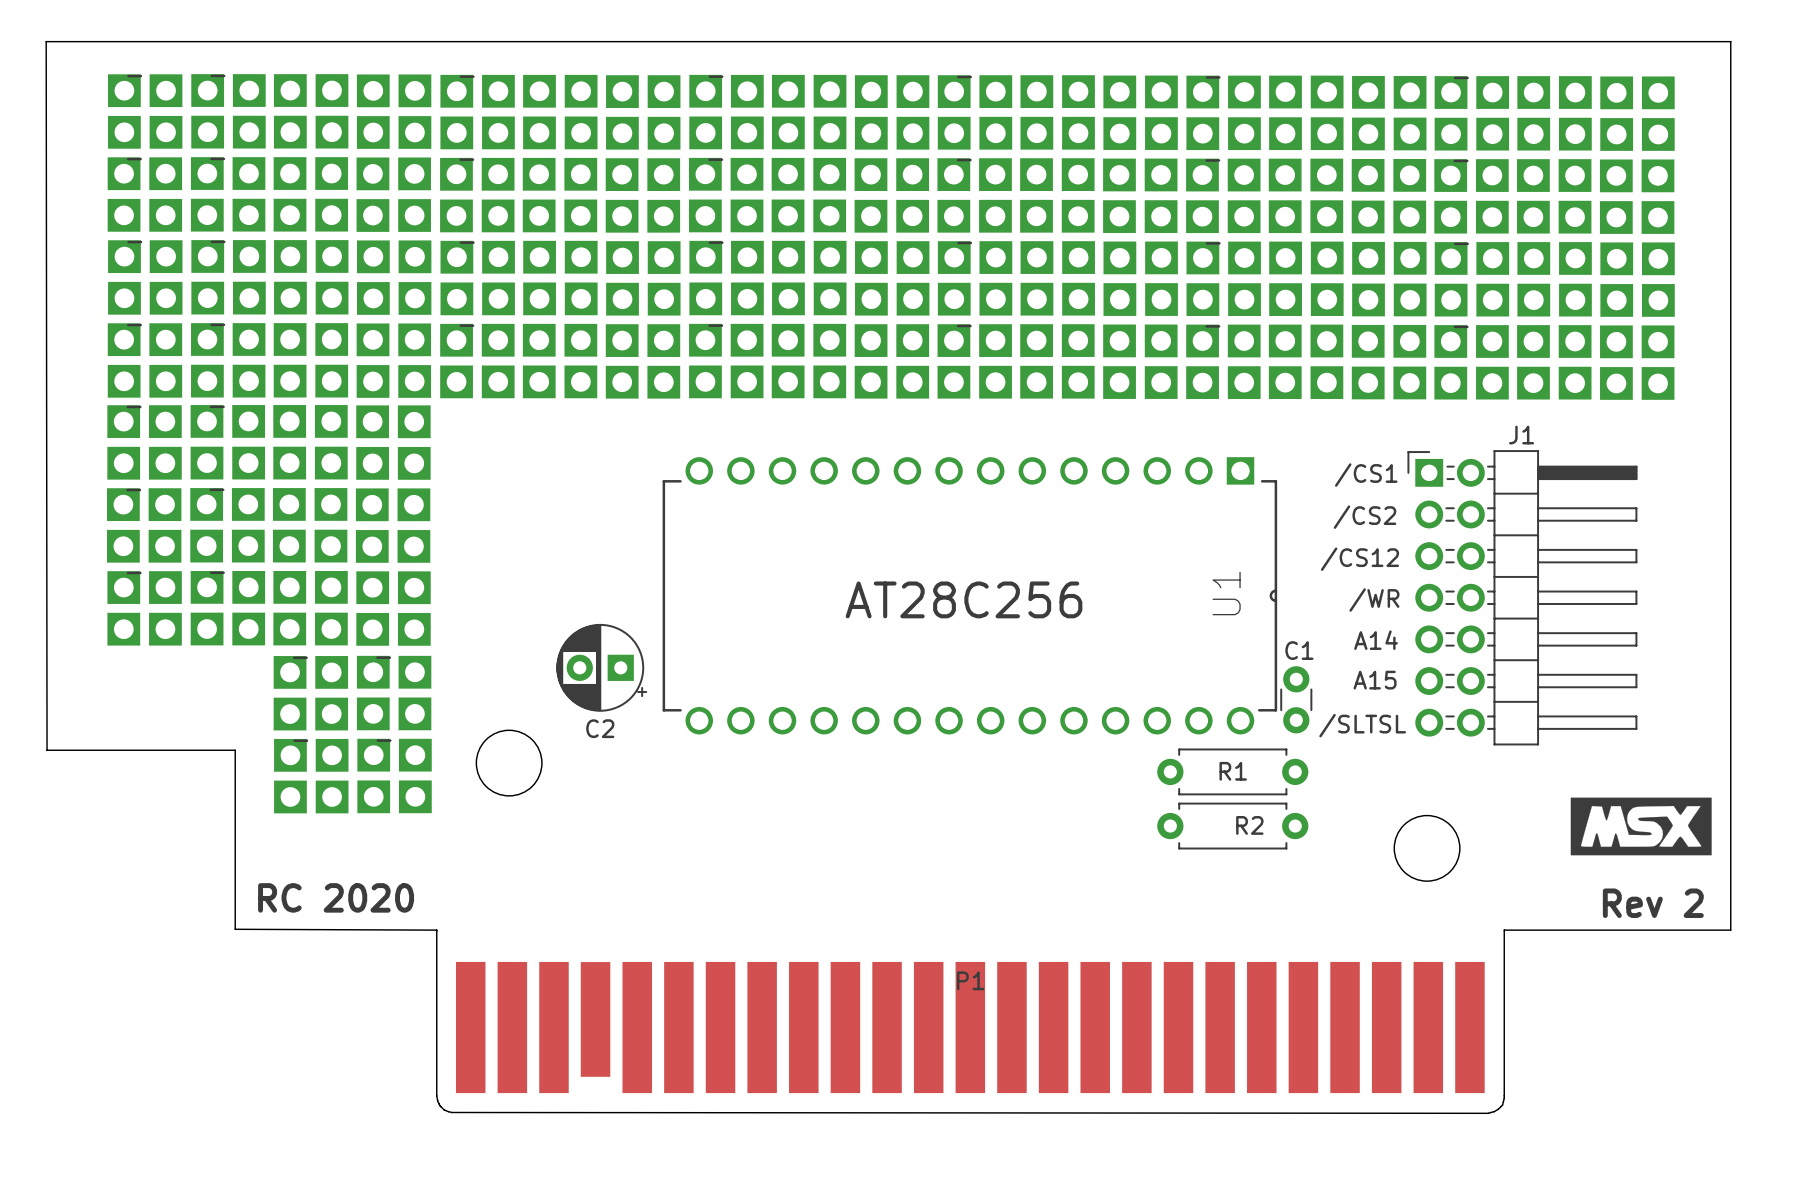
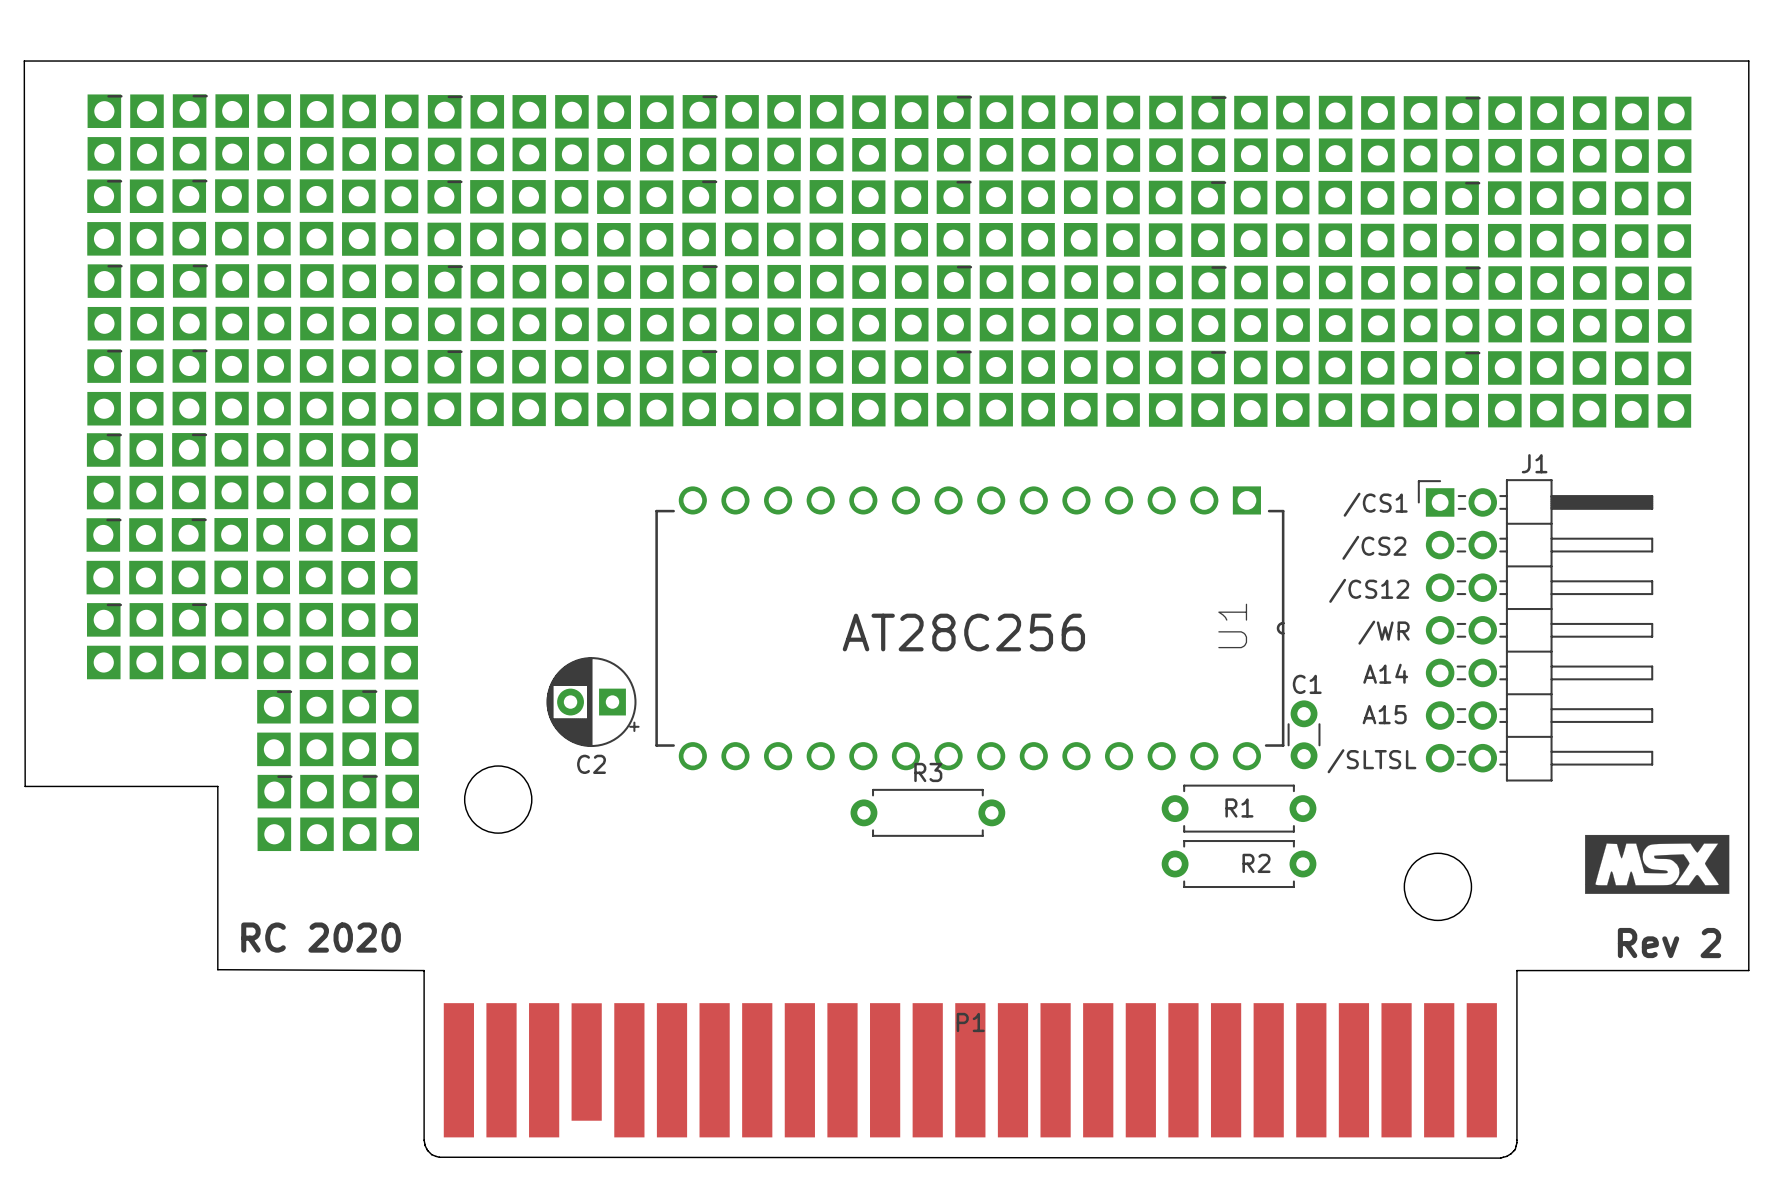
R3: none -> (927, 812)

